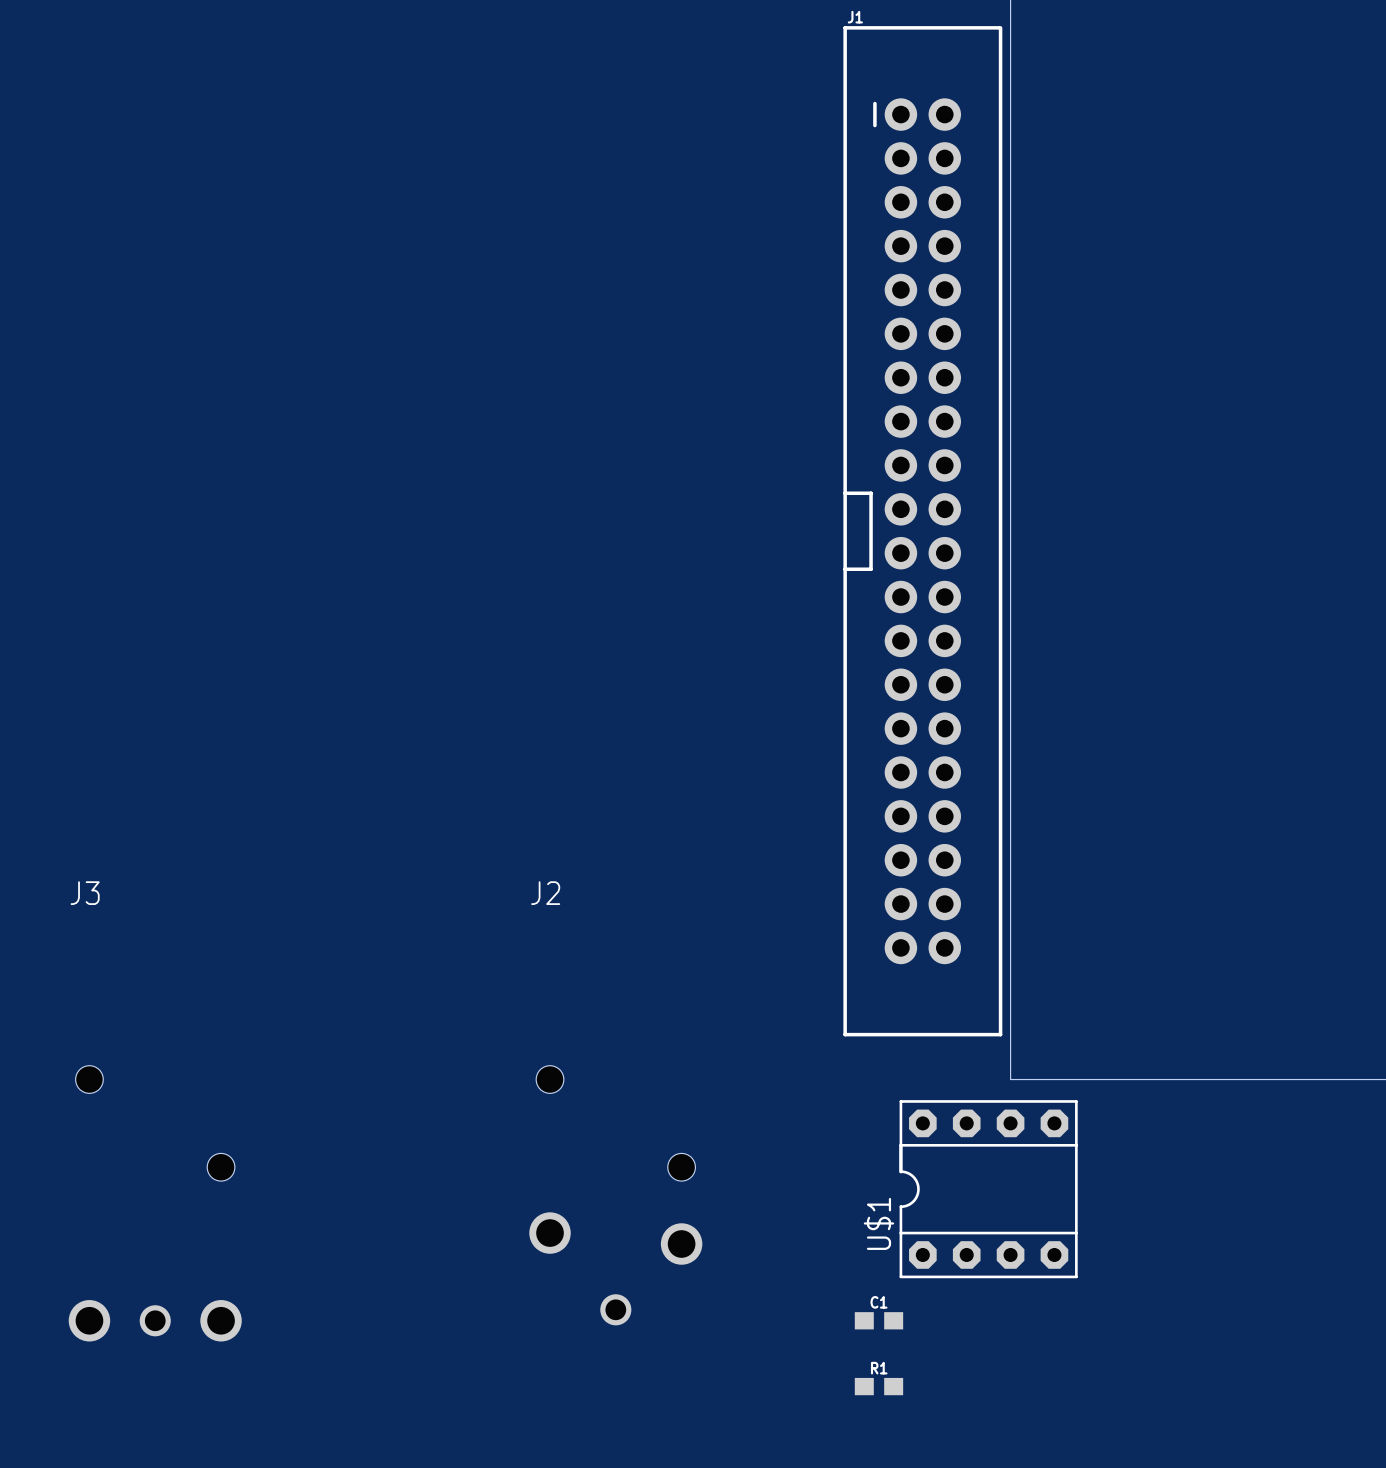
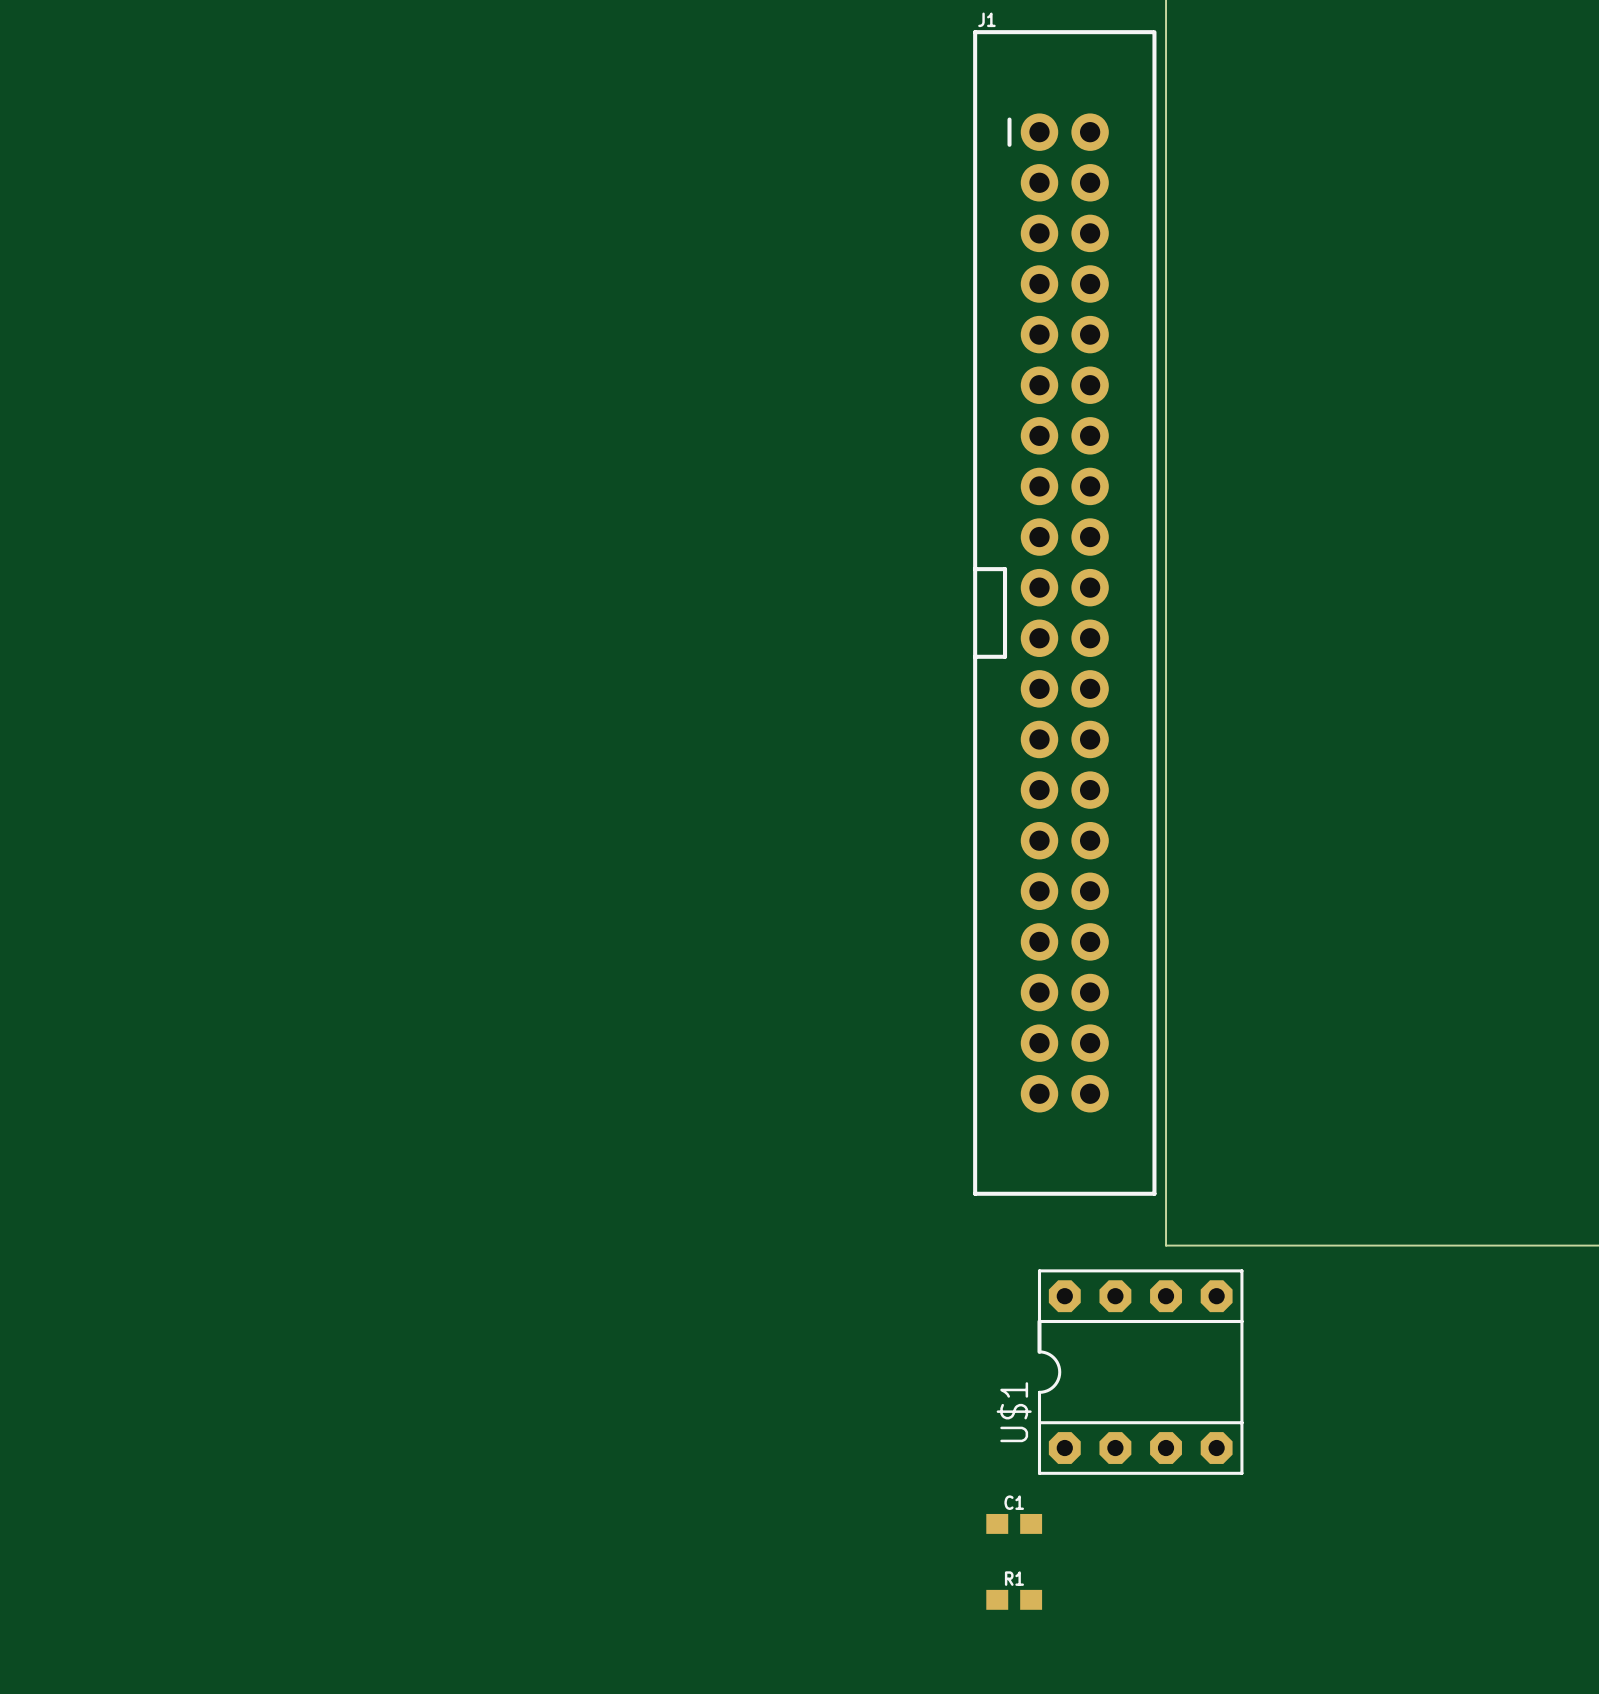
J2: (615, 1195) -> none
J3: (155, 1203) -> none

